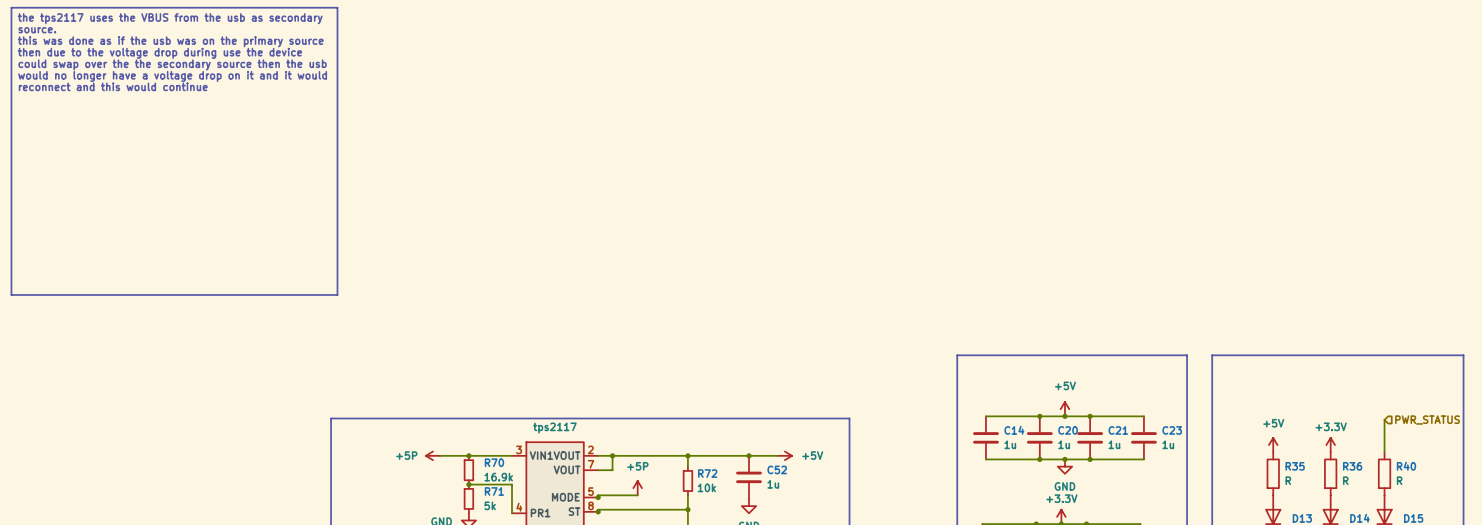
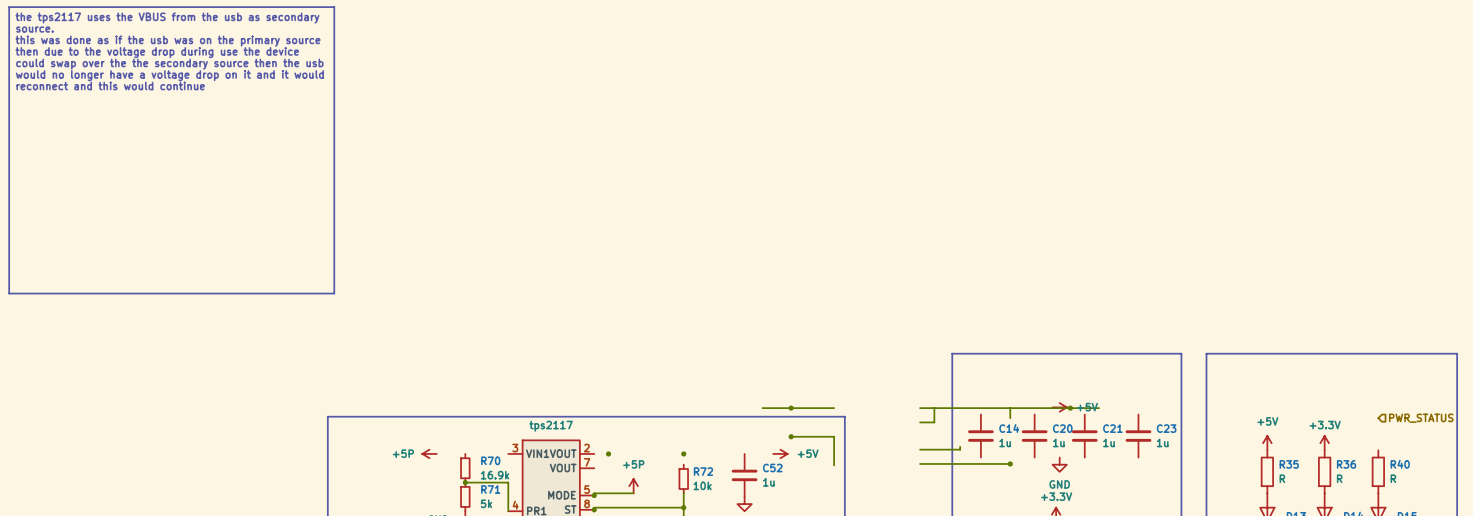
wire: none -> (762, 408) (834, 408)
junction: none -> (791, 408)
wire: none -> (920, 408) (1099, 408)
wire: none -> (934, 408) (934, 422) (920, 422)
wire: none -> (1010, 408) (1010, 418)
power symbol rotation: 0° (1064, 409) -> 90° clockwise (1059, 407)
junction: none -> (1070, 408)
wire: (985, 416) (1143, 416) -> none
junction: (1039, 416) -> none
junction: (1064, 416) -> none
junction: (1090, 416) -> none
wire: (1384, 419) (1384, 452) -> none
wire: none -> (791, 436) (834, 436) (834, 465)
junction: none -> (791, 436)
wire: none -> (960, 446) (960, 449) (920, 449)
wire: (440, 455) (512, 455) -> none
junction: (468, 455) -> none
wire: (598, 455) (777, 455) -> none
wire: (612, 455) (612, 470) (598, 470) -> none
wire: (687, 455) (687, 466) -> none
junction: (748, 455) -> none
wire: (985, 459) (1143, 459) -> none
junction: (1039, 459) -> none
junction: (1064, 459) -> none
junction: (1090, 459) -> none
wire: none -> (920, 463) (1010, 463)
junction: none -> (1010, 463)

